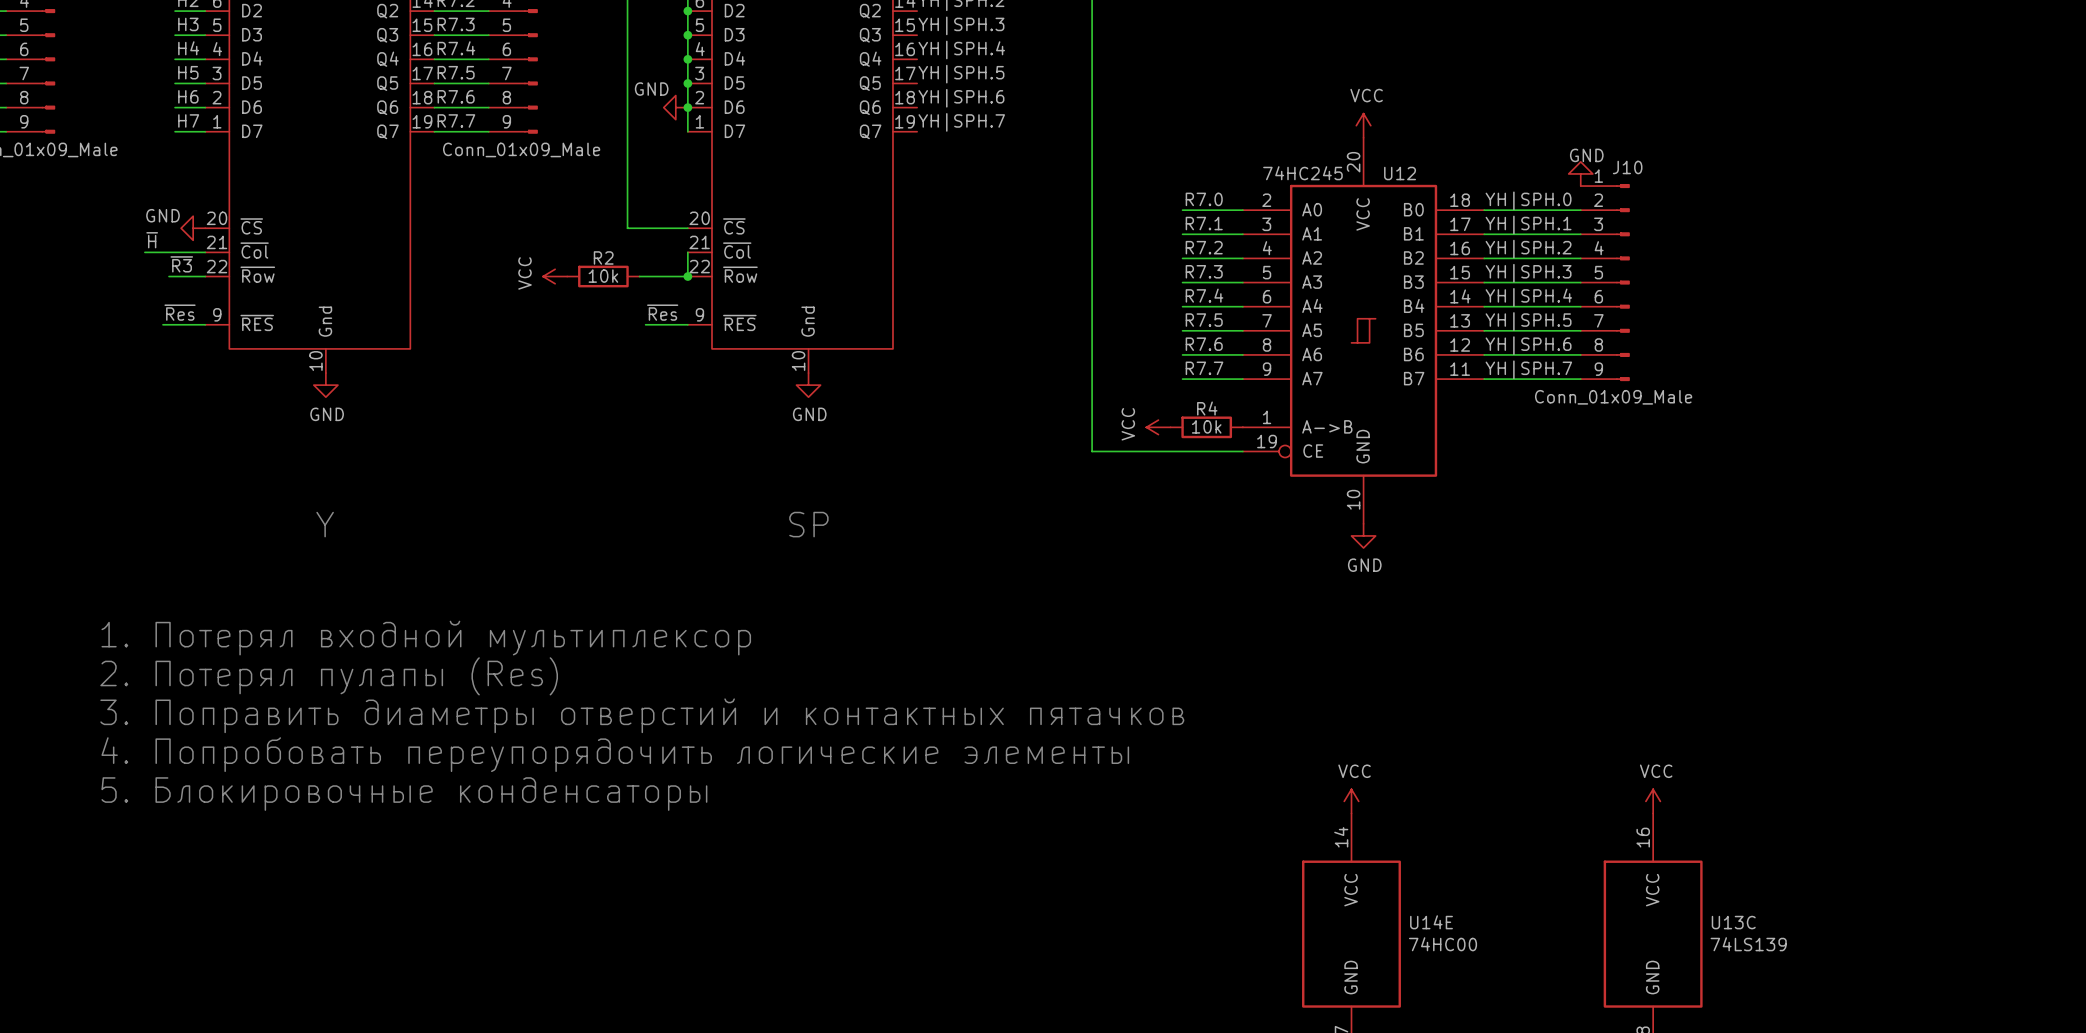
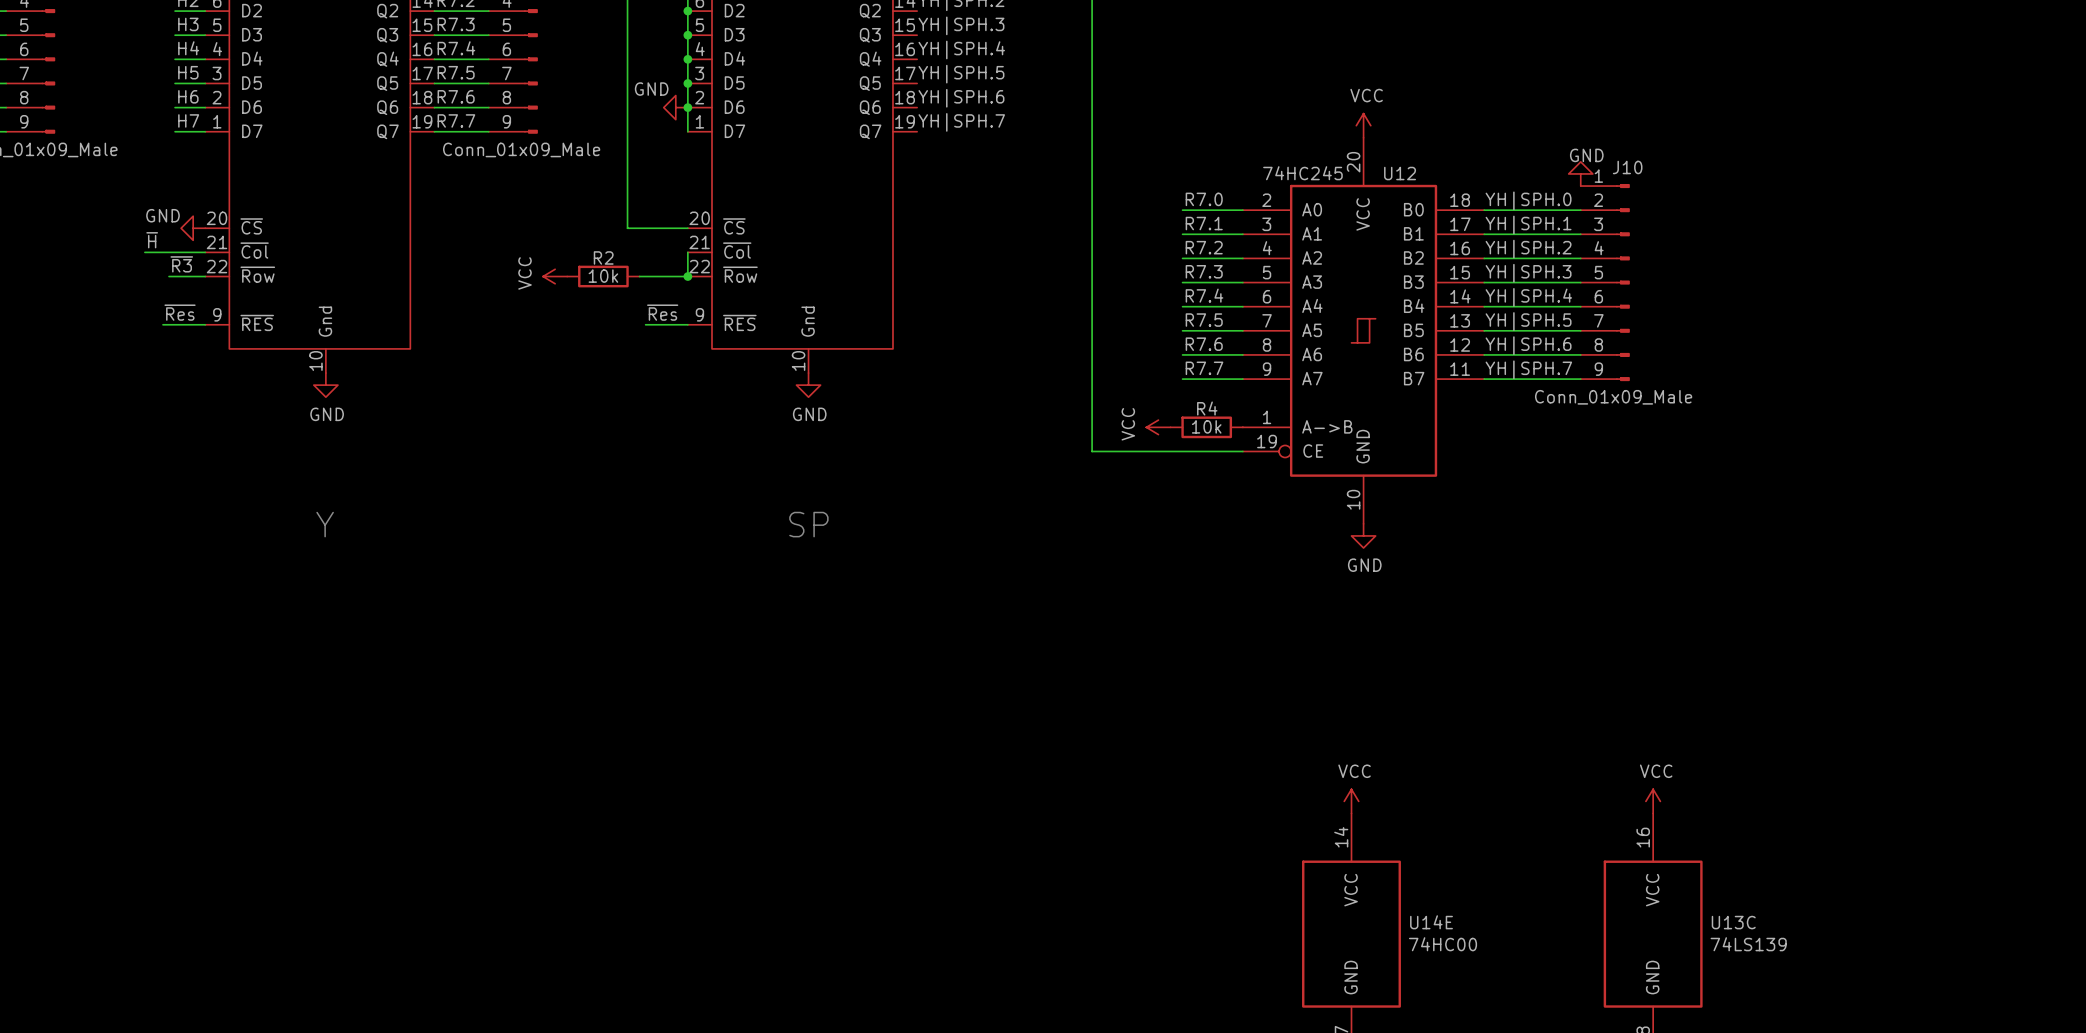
text: 1. Потерял входной мультиплексор (426, 638) -> none
text: 2. Потерял пулапы (Res) (329, 676) -> none
text: 3. Поправить диаметры отверстий и контактных пятачков (642, 715) -> none
text: 4. Попробовать переупорядочить логические элементы (615, 754) -> none
text: 5. Блокировочные конденсаторы (404, 794) -> none

